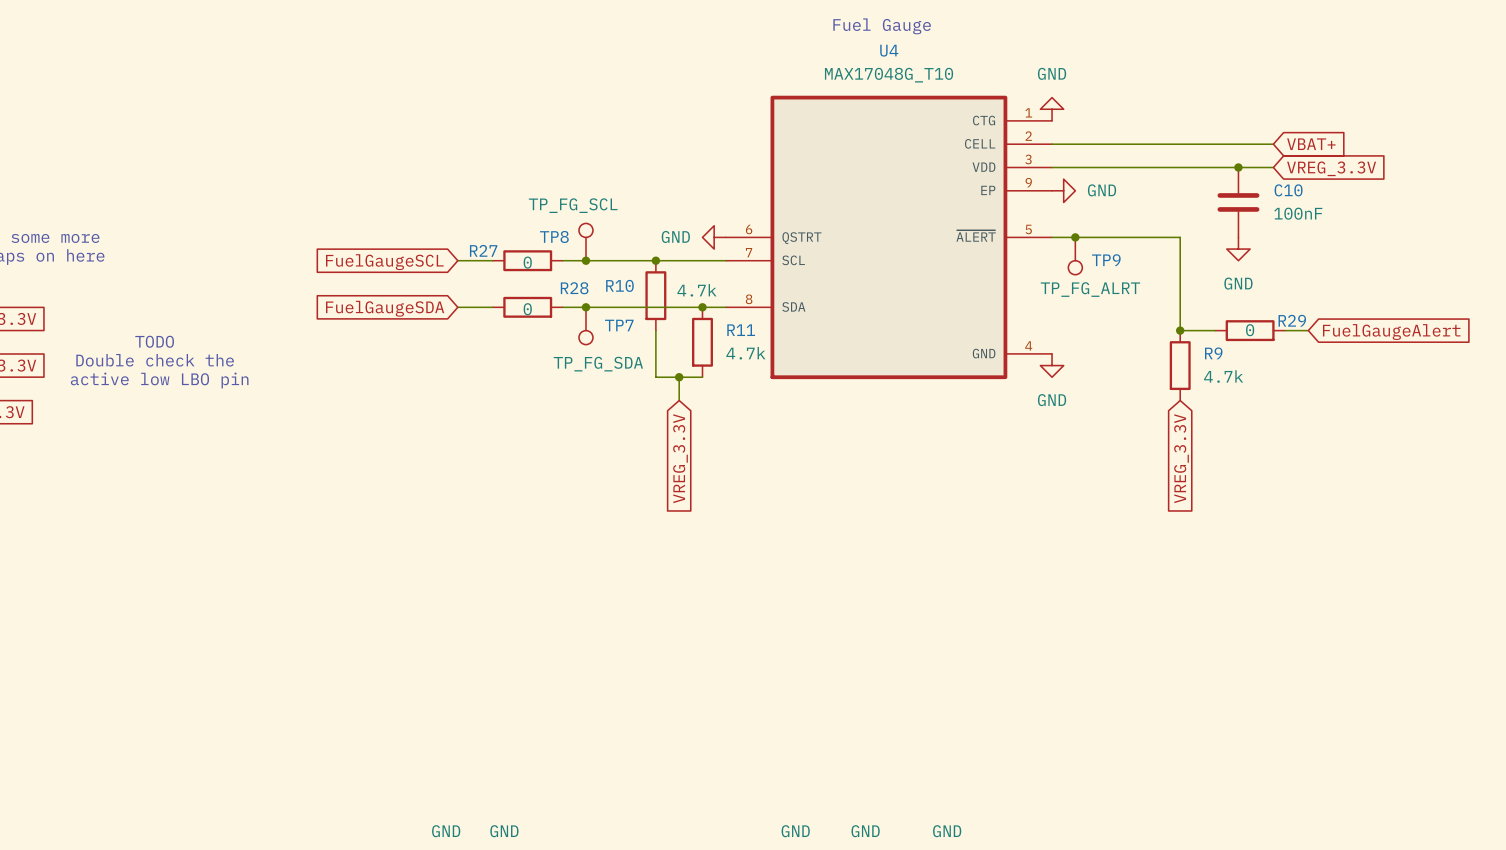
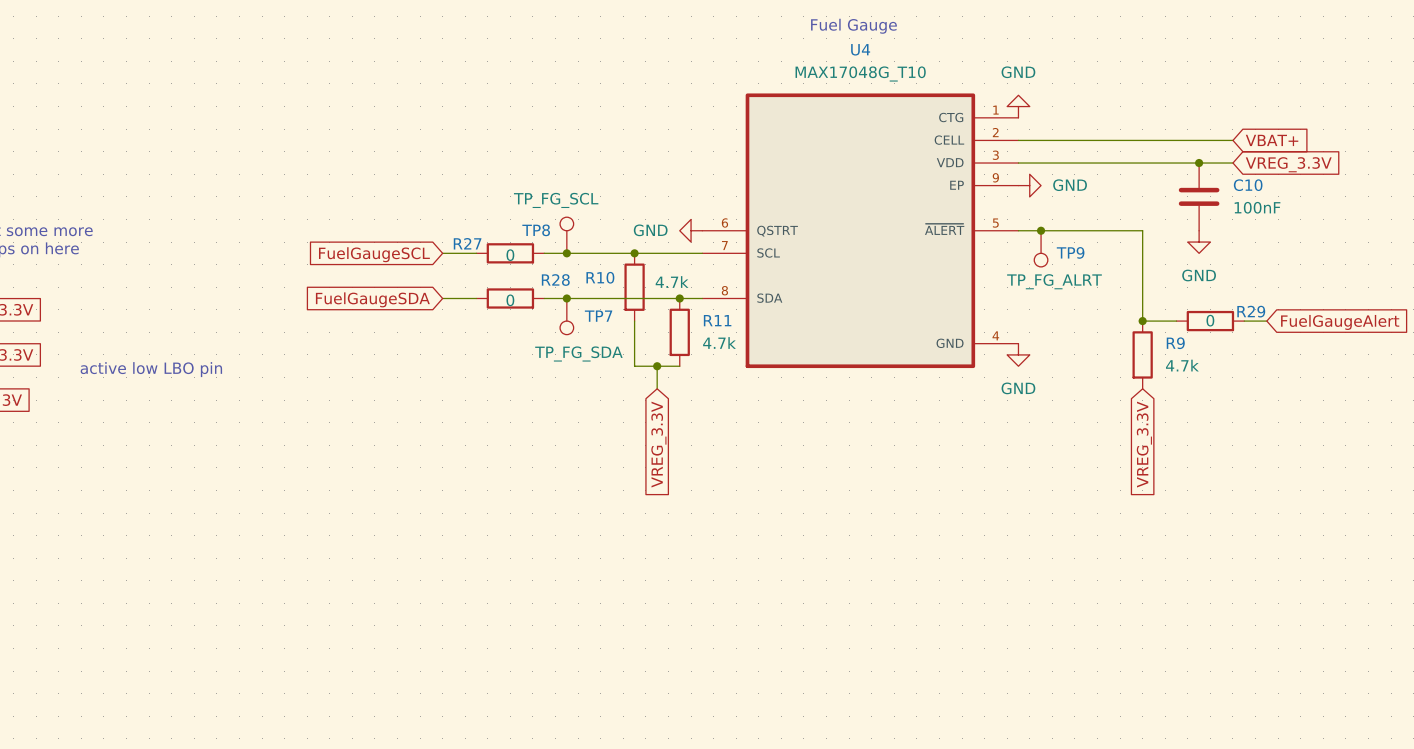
text: TODO (154, 341) -> none
text: Double check the (155, 360) -> none

